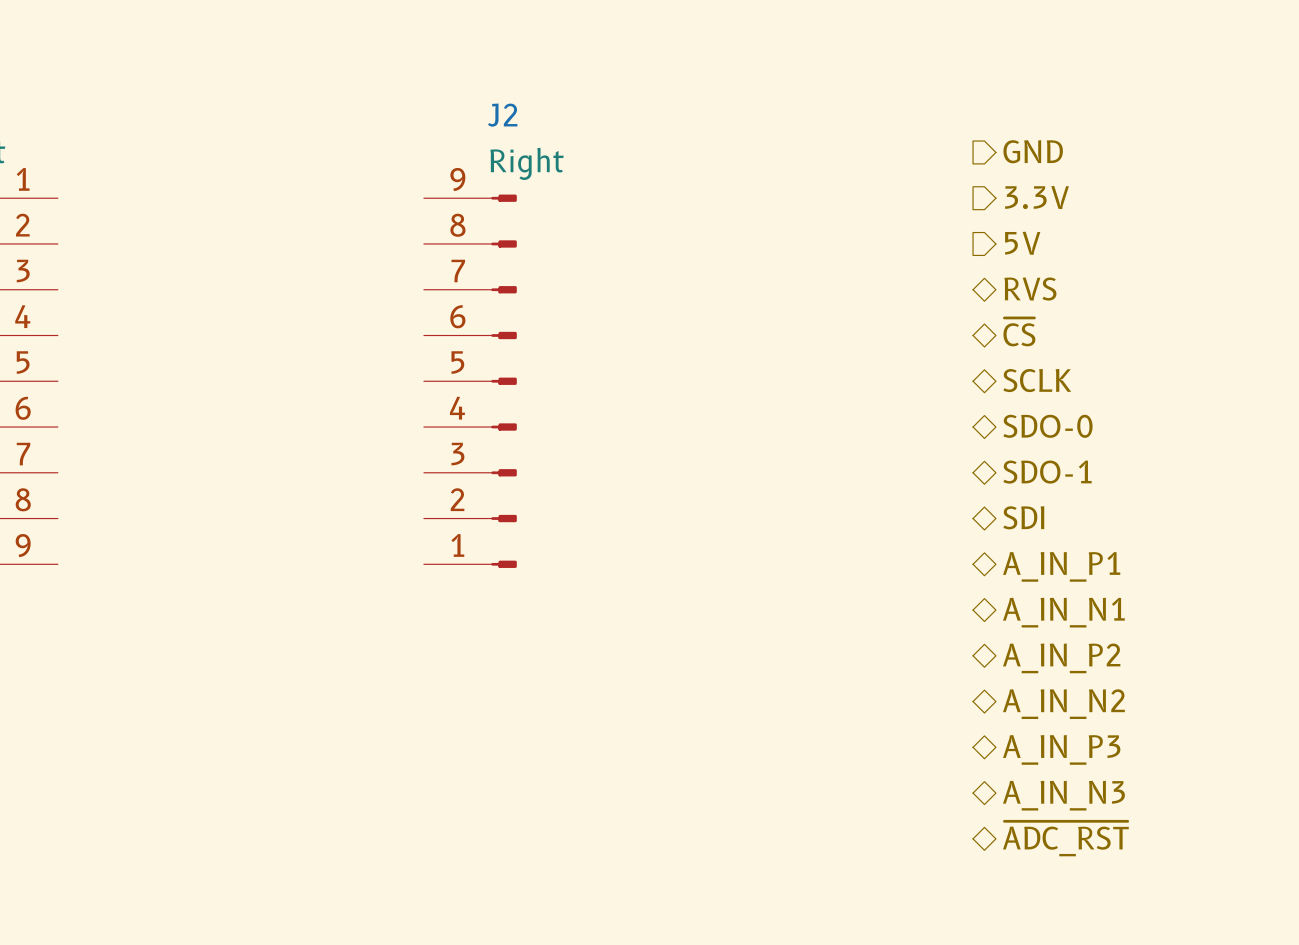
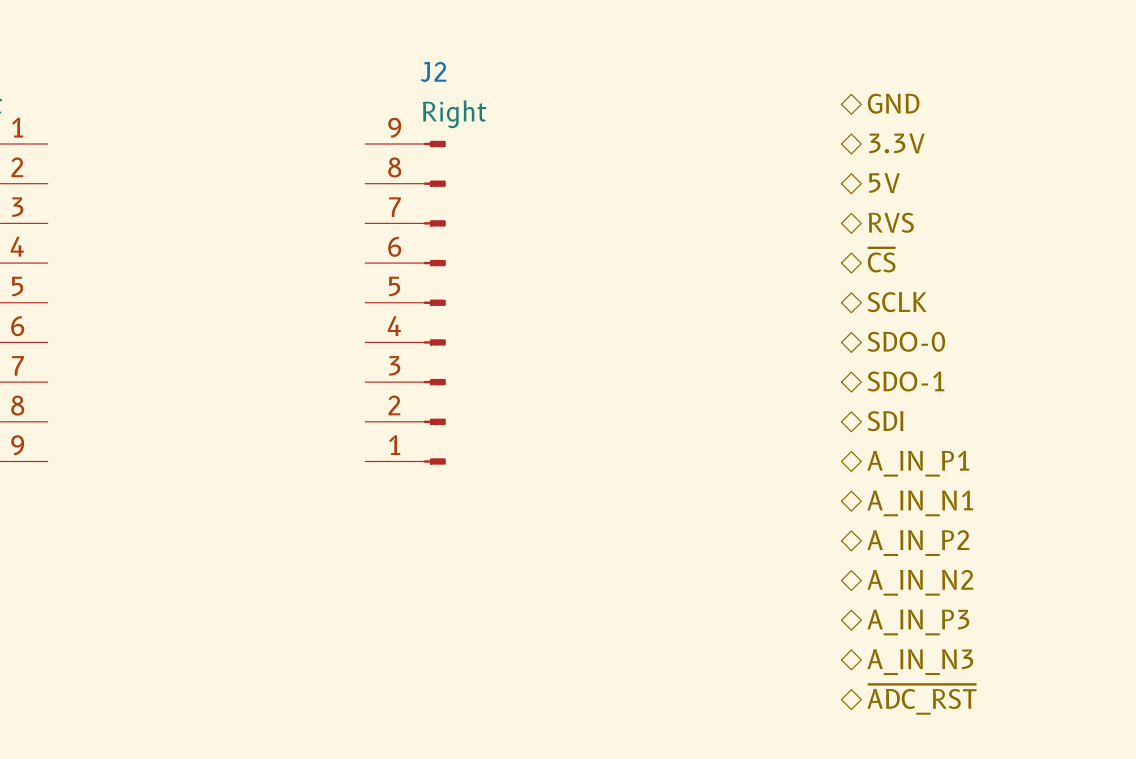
hierarchical label shape: output (1033, 151) -> bidirectional (893, 103)
hierarchical label shape: output (1037, 197) -> bidirectional (896, 143)
hierarchical label shape: output (1022, 243) -> bidirectional (884, 183)

